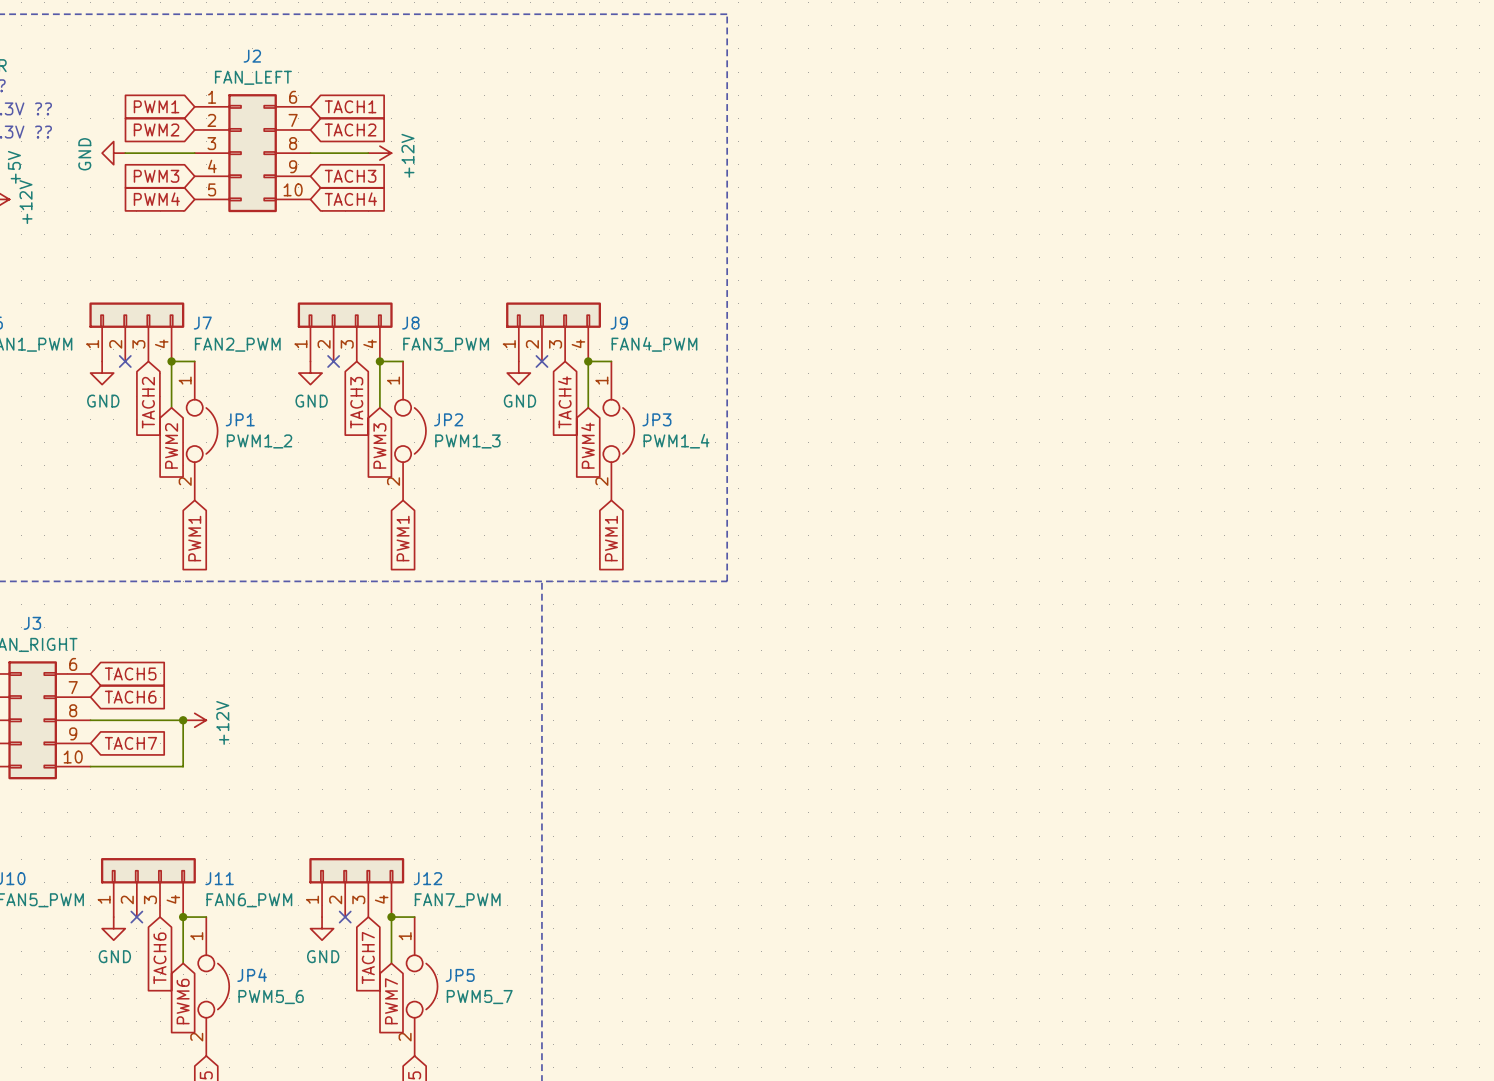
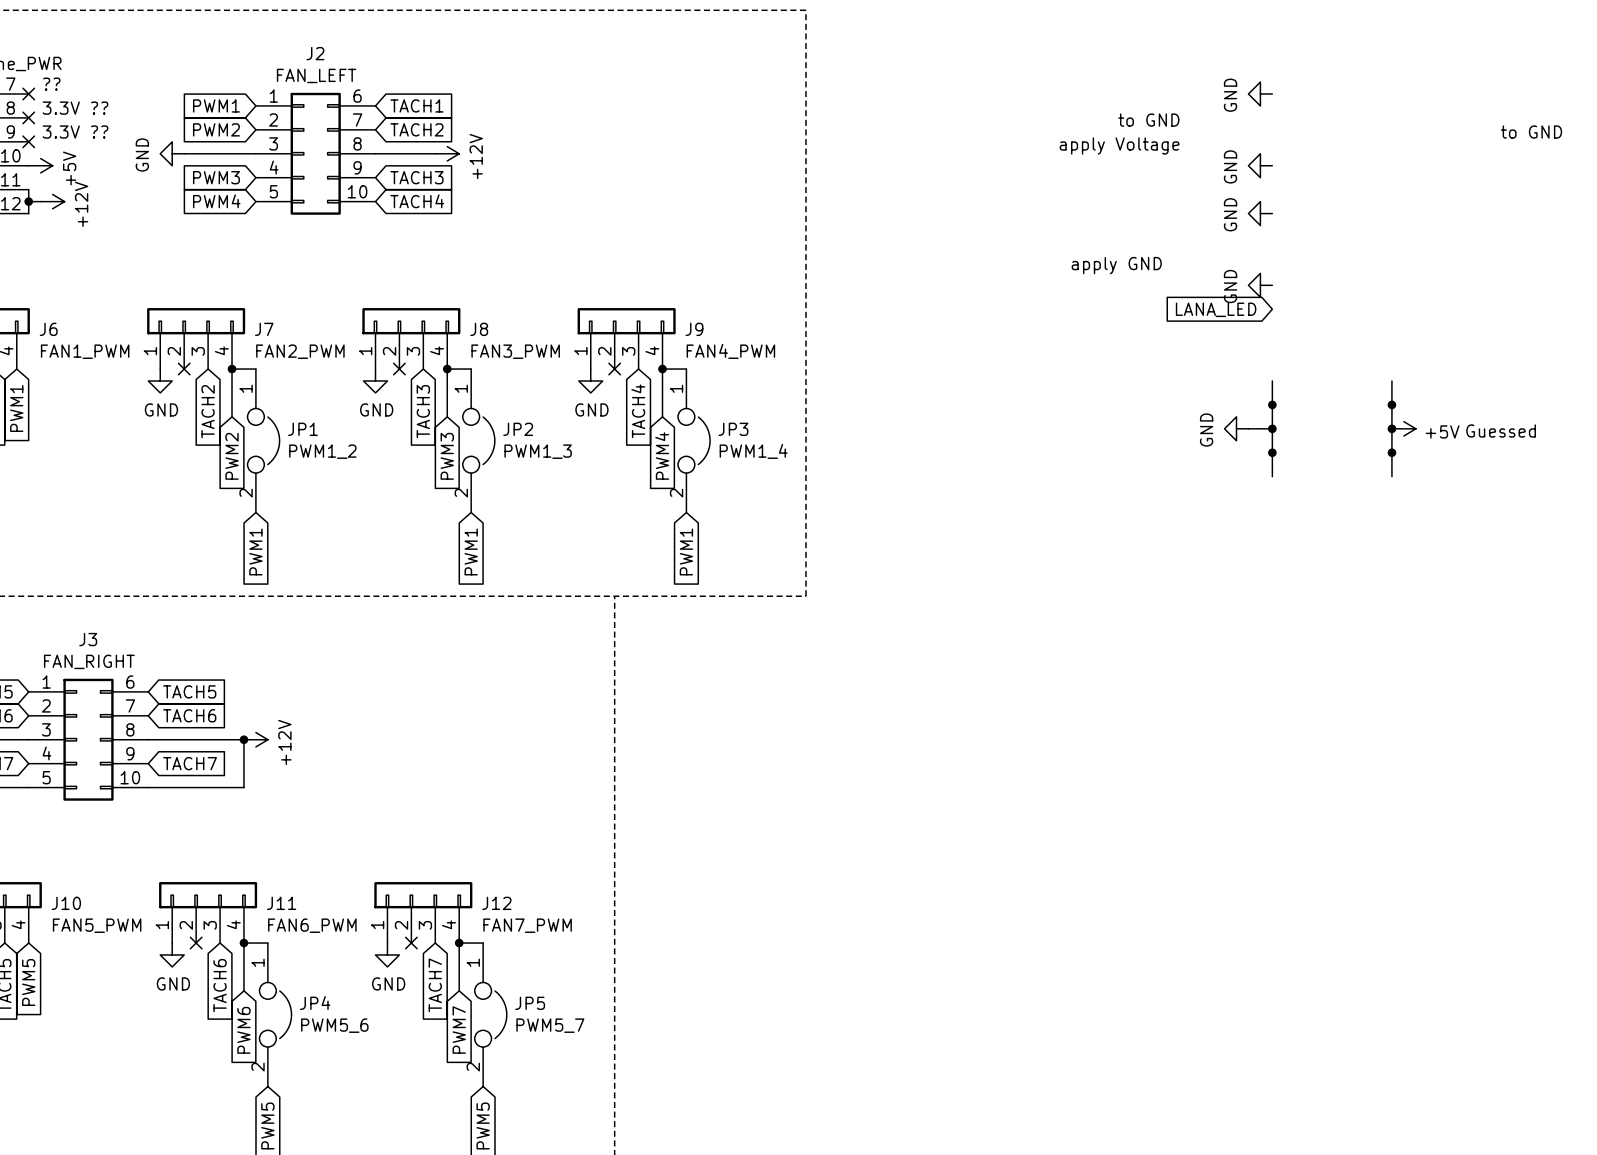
power symbol: none -> GND (1260, 93)
text: none -> to GND (1148, 120)
text: none -> to GND (1531, 132)
text: none -> apply Voltage (1119, 145)
power symbol: none -> GND (1260, 165)
power symbol: none -> GND (1260, 213)
text: none -> apply GND (1116, 265)
power symbol: none -> GND (1260, 285)
global label: none -> LANA_LED (1216, 309)
wire: none -> (1272, 380) (1272, 476)
wire: none -> (1391, 380) (1391, 476)
junction: none -> (1272, 404)
junction: none -> (1391, 404)
power symbol: none -> GND (1236, 428)
wire: none -> (1248, 428) (1272, 428)
junction: none -> (1272, 428)
junction: none -> (1391, 428)
power symbol: none -> +5V (1403, 428)
text: none -> Guessed (1501, 430)
junction: none -> (1272, 452)
junction: none -> (1391, 452)

